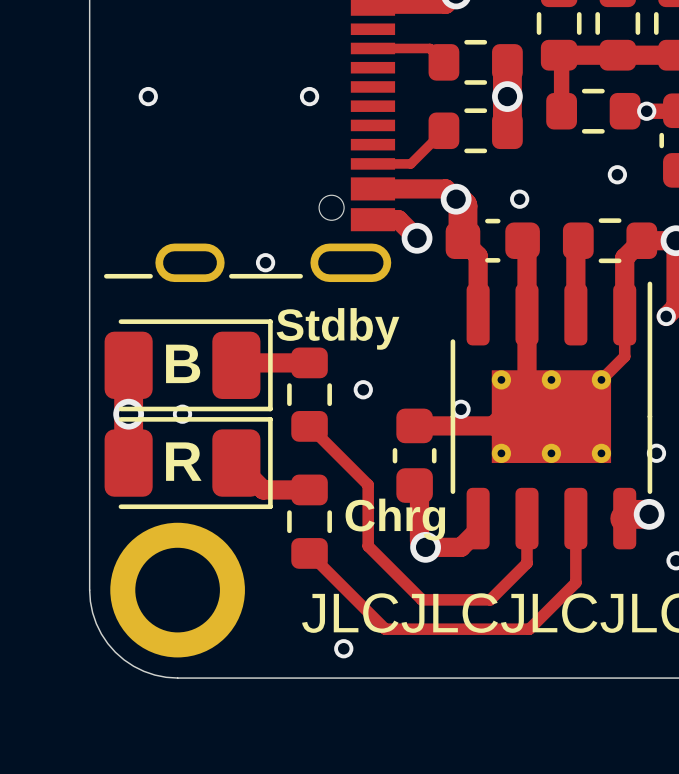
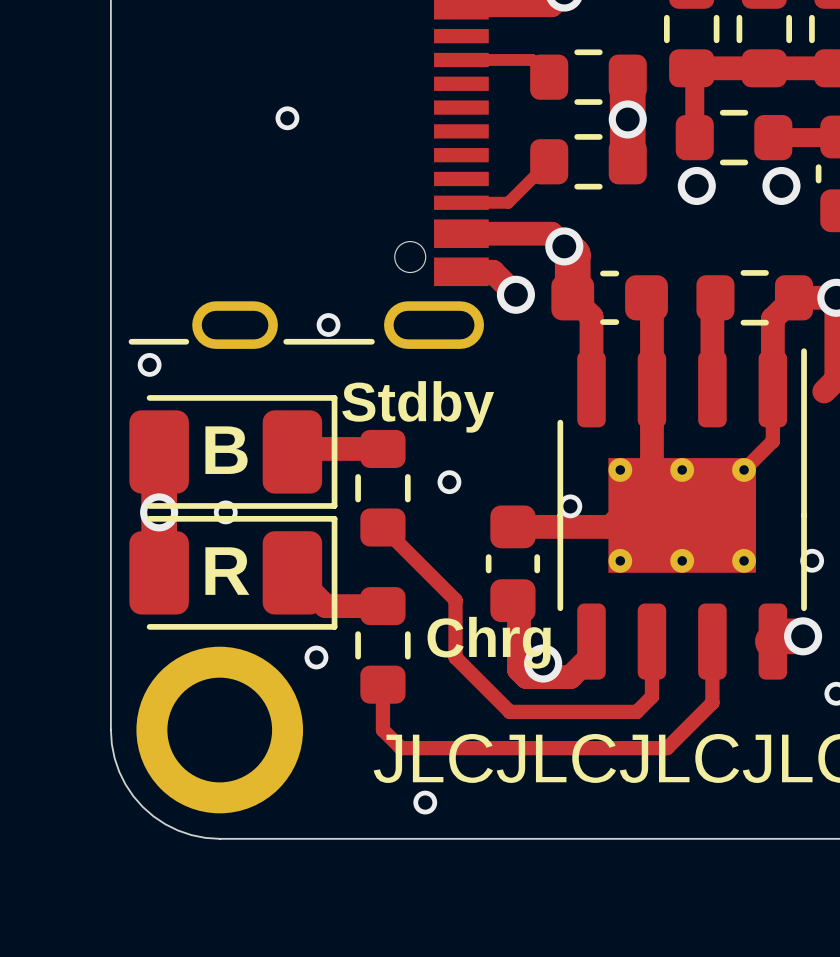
via: none -> (287, 118)
via: (148, 96) -> none
via: (309, 96) -> none
via: (646, 111) -> none
via: none -> (696, 185)
via position: (617, 174) -> (781, 185)
via: (519, 199) -> none
via: none -> (149, 364)
via: (666, 316) -> none
via: none -> (316, 657)
track: (368, 531) (368, 546) (421, 599) (490, 599) (514, 575) -> (455, 657) (509, 711) (636, 711)
via position: (425, 547) -> (543, 663)
track: (309, 553) (385, 629) (529, 629) (575, 582) (575, 568) -> (382, 684) (382, 730) (401, 748) (667, 748) (712, 702)

